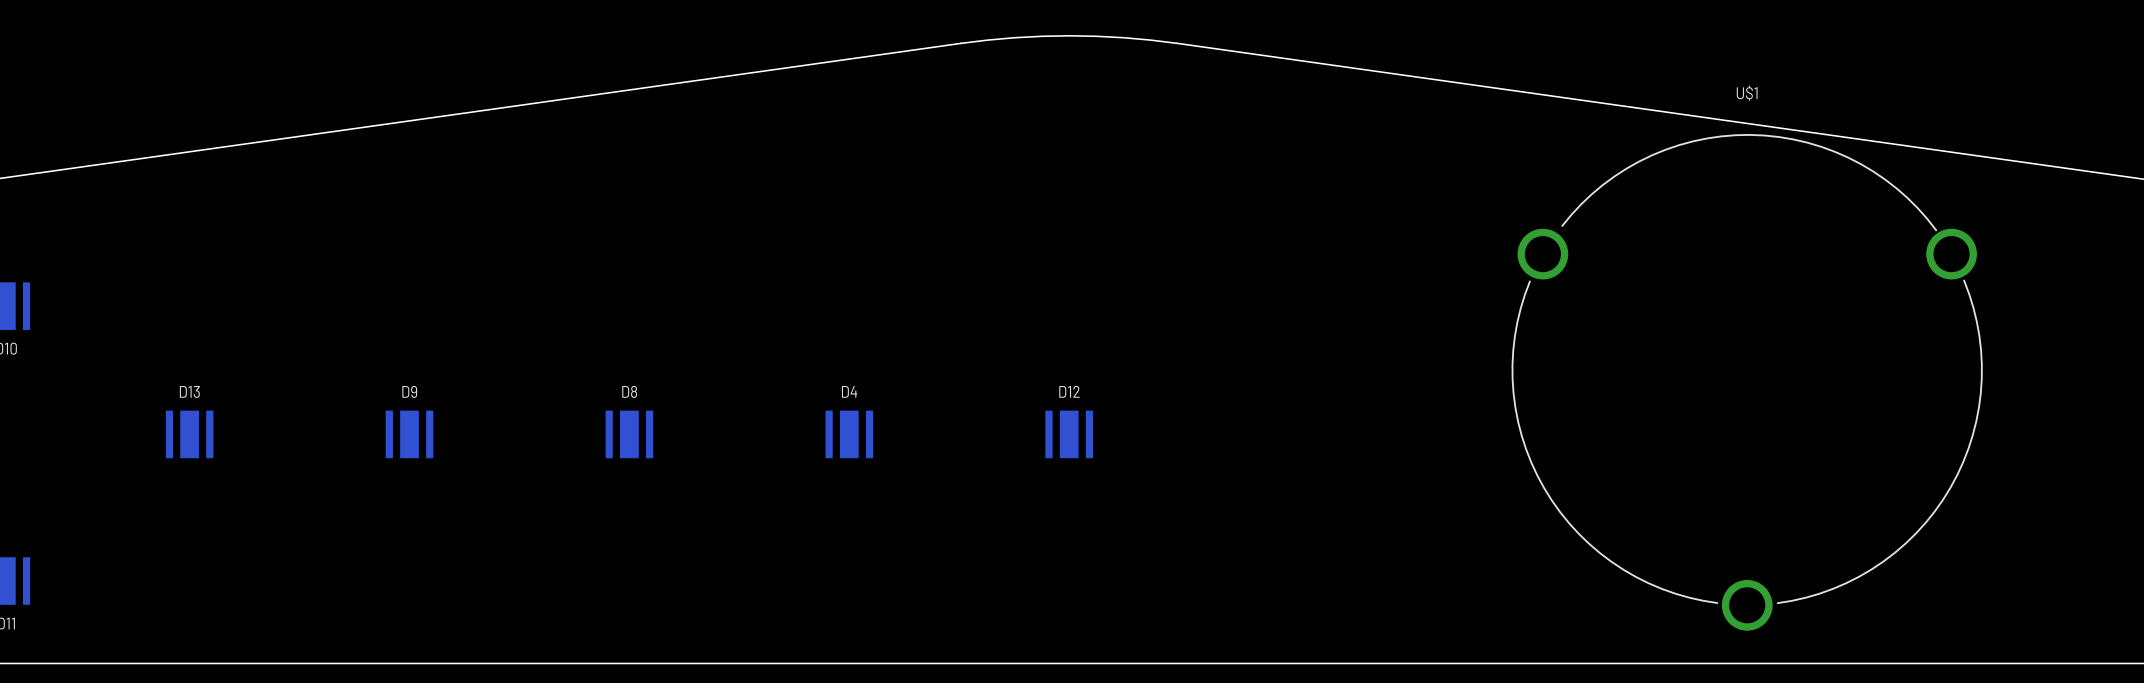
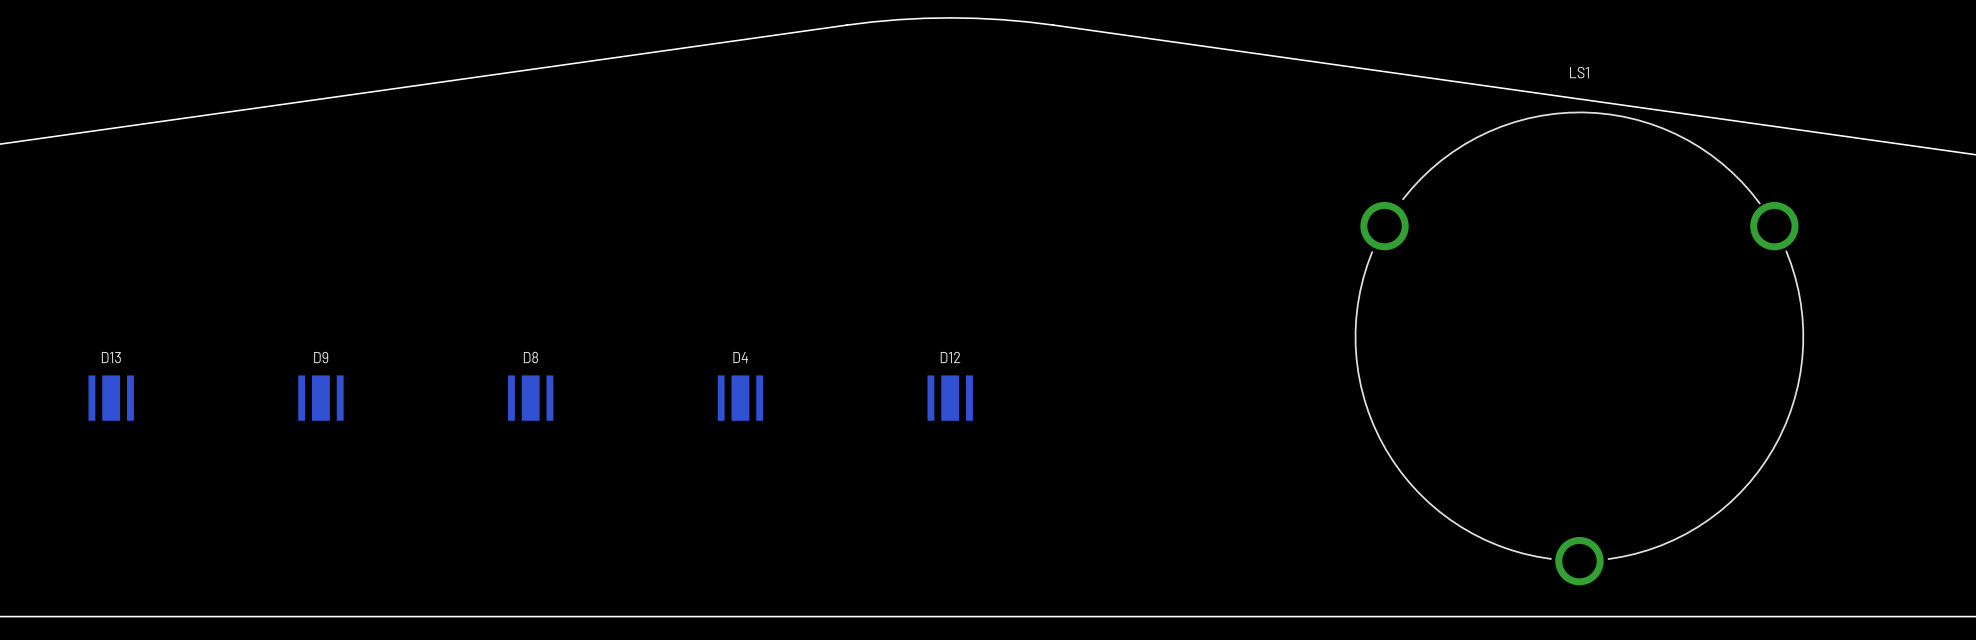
LS1: none -> (1579, 348)
U$1: (1747, 382) -> none

